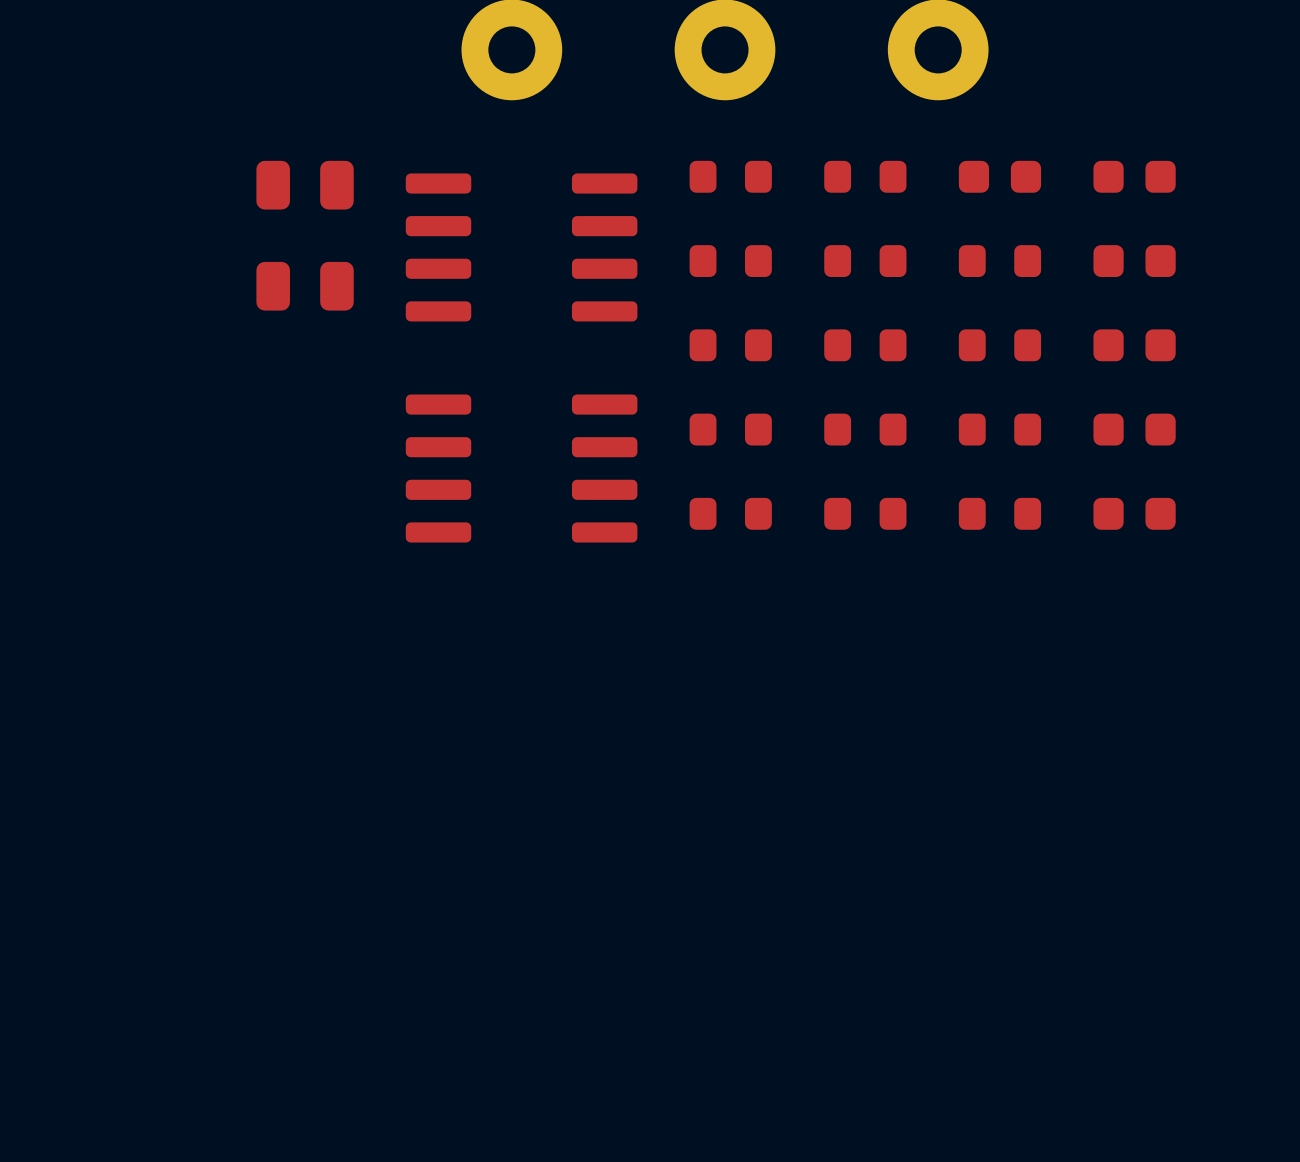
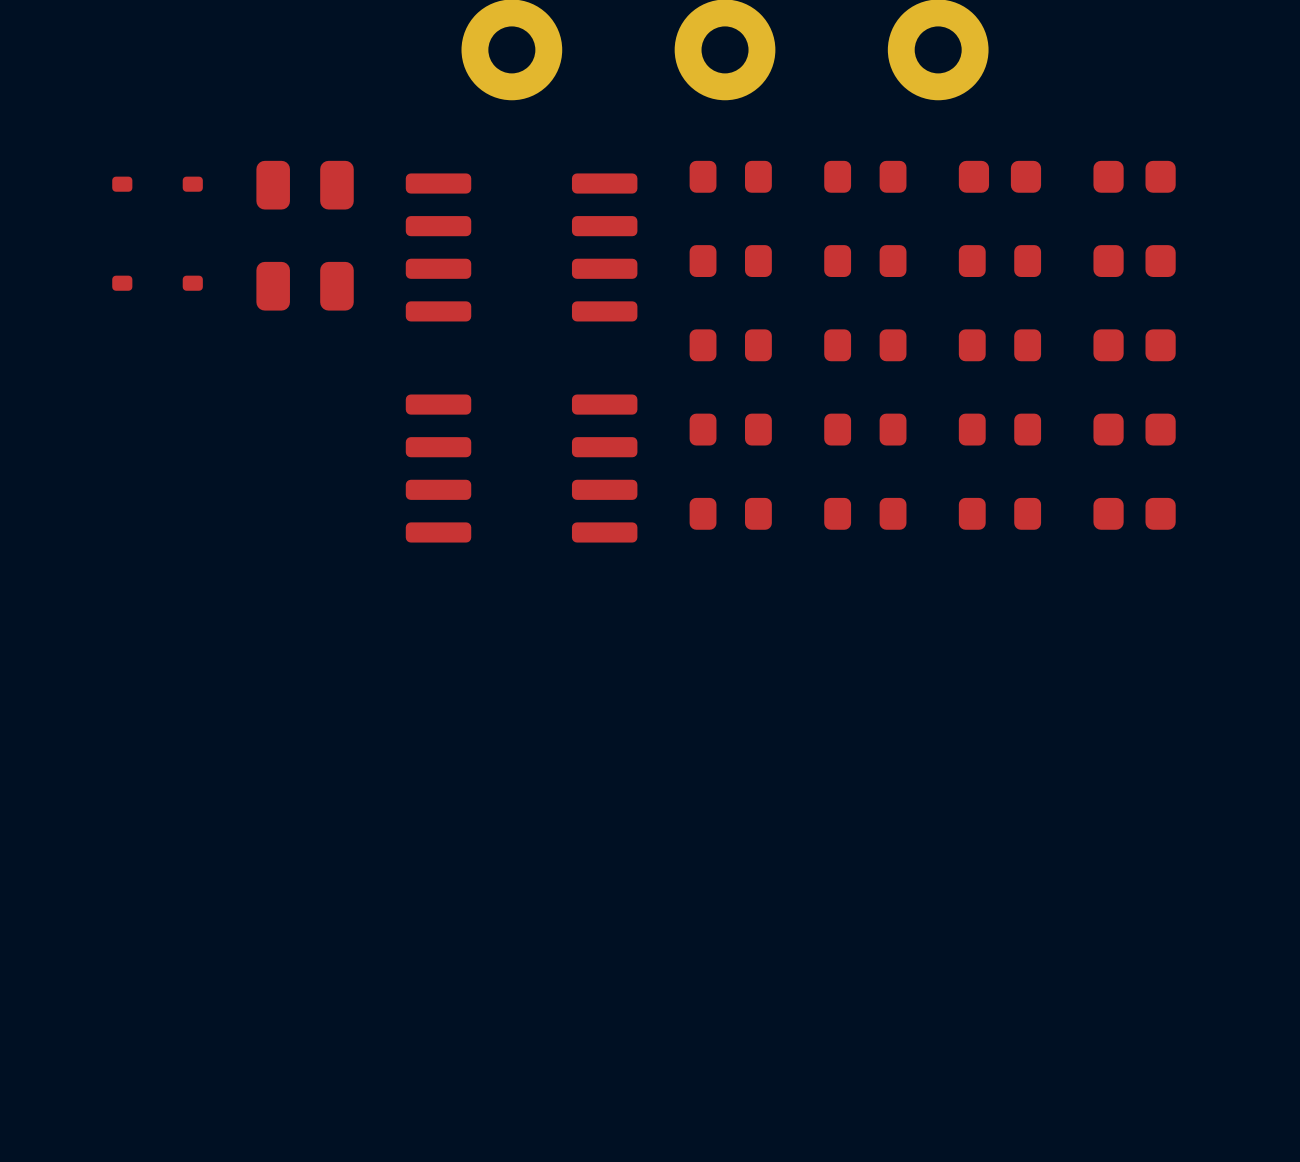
part: none -> (157, 184)
part: none -> (157, 283)

